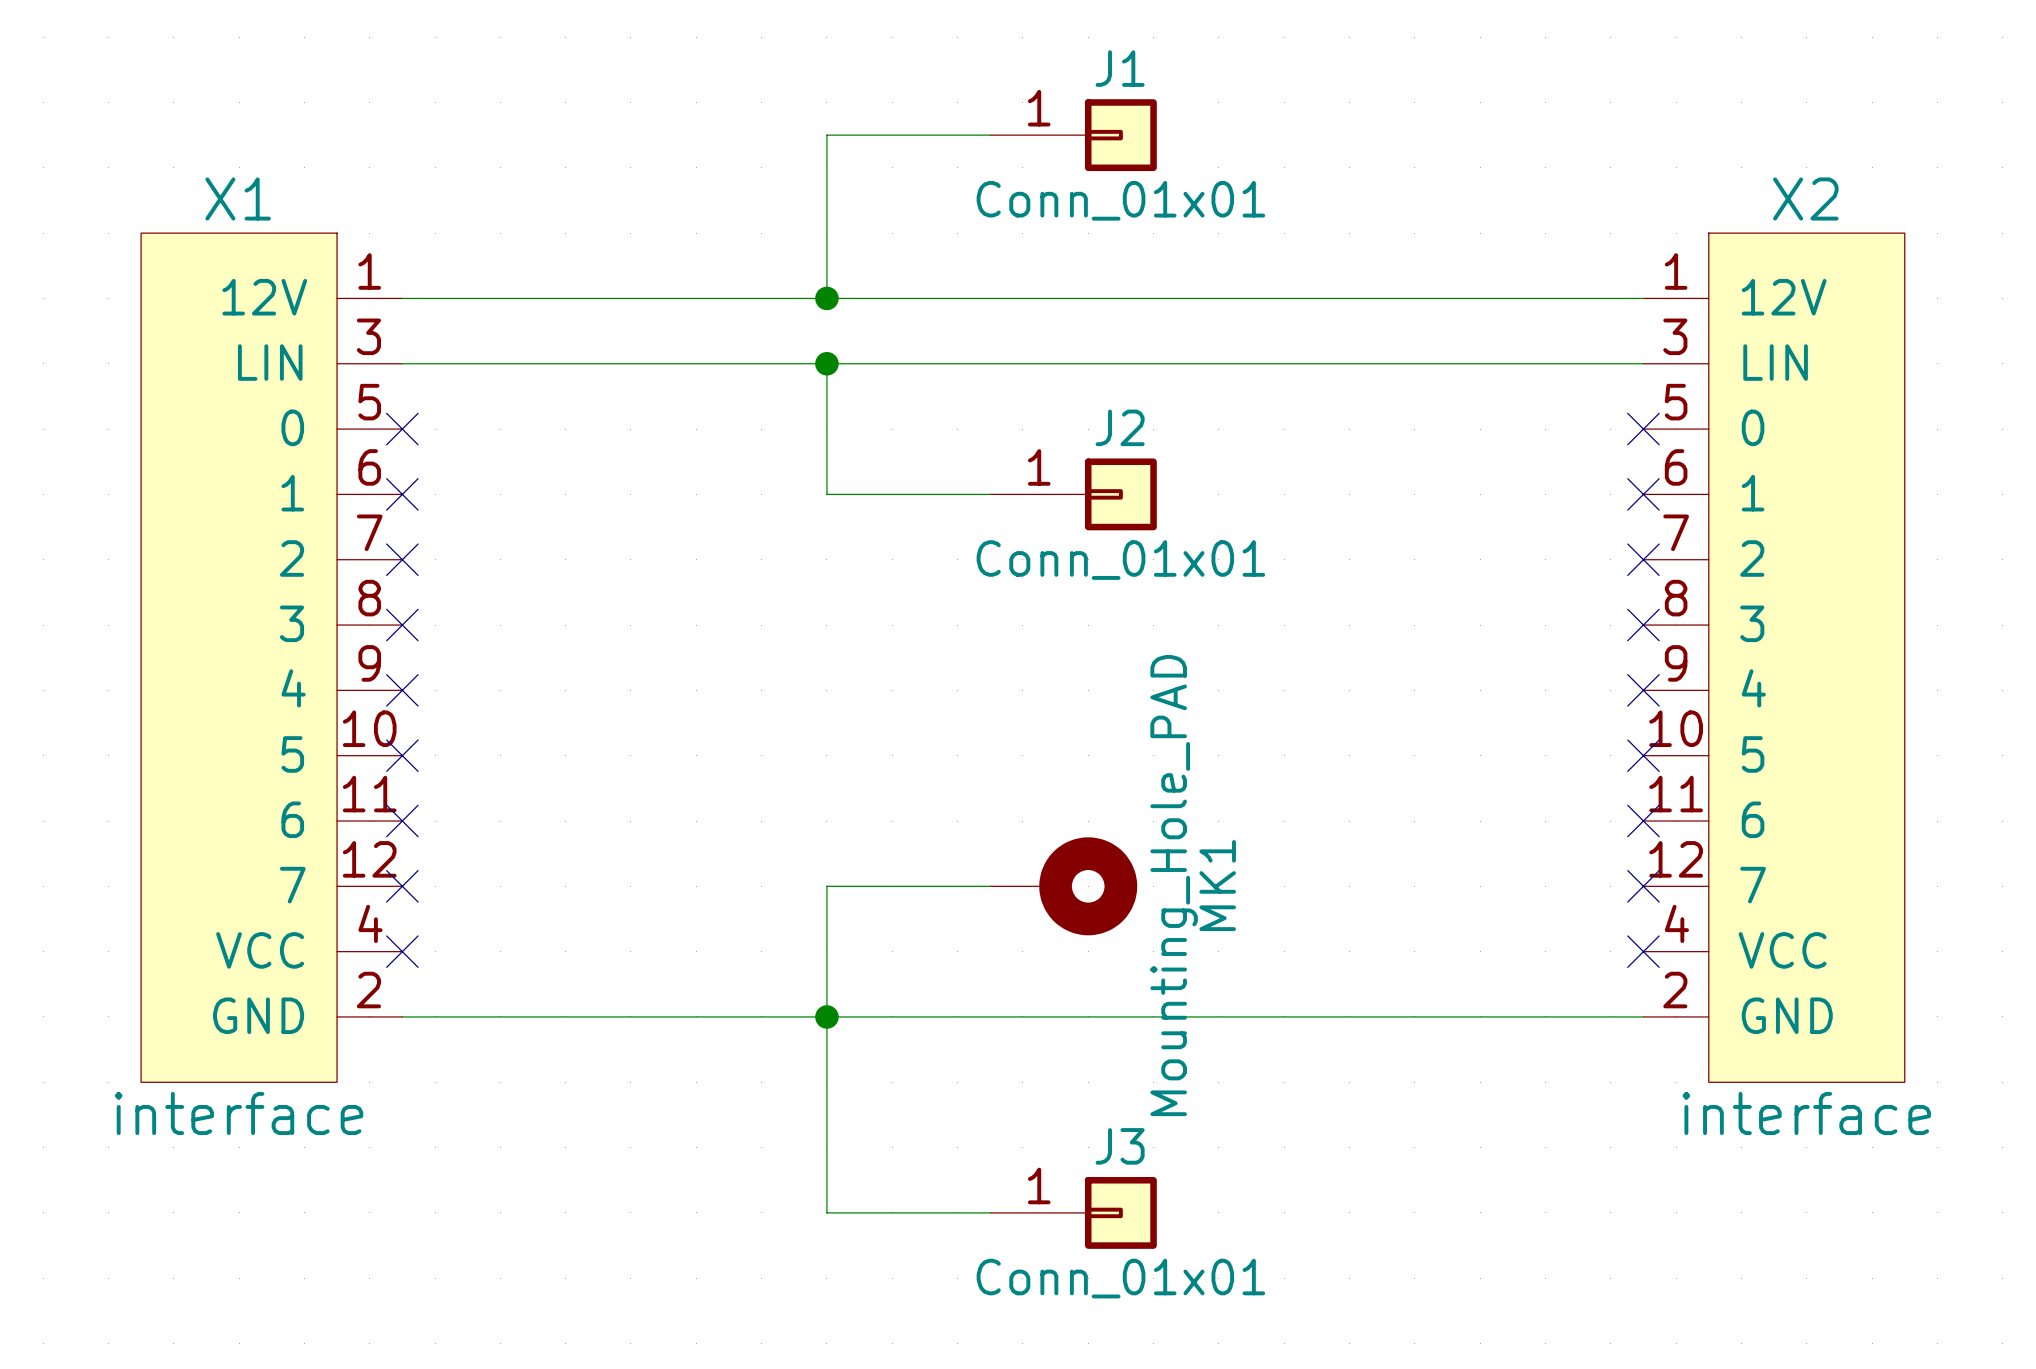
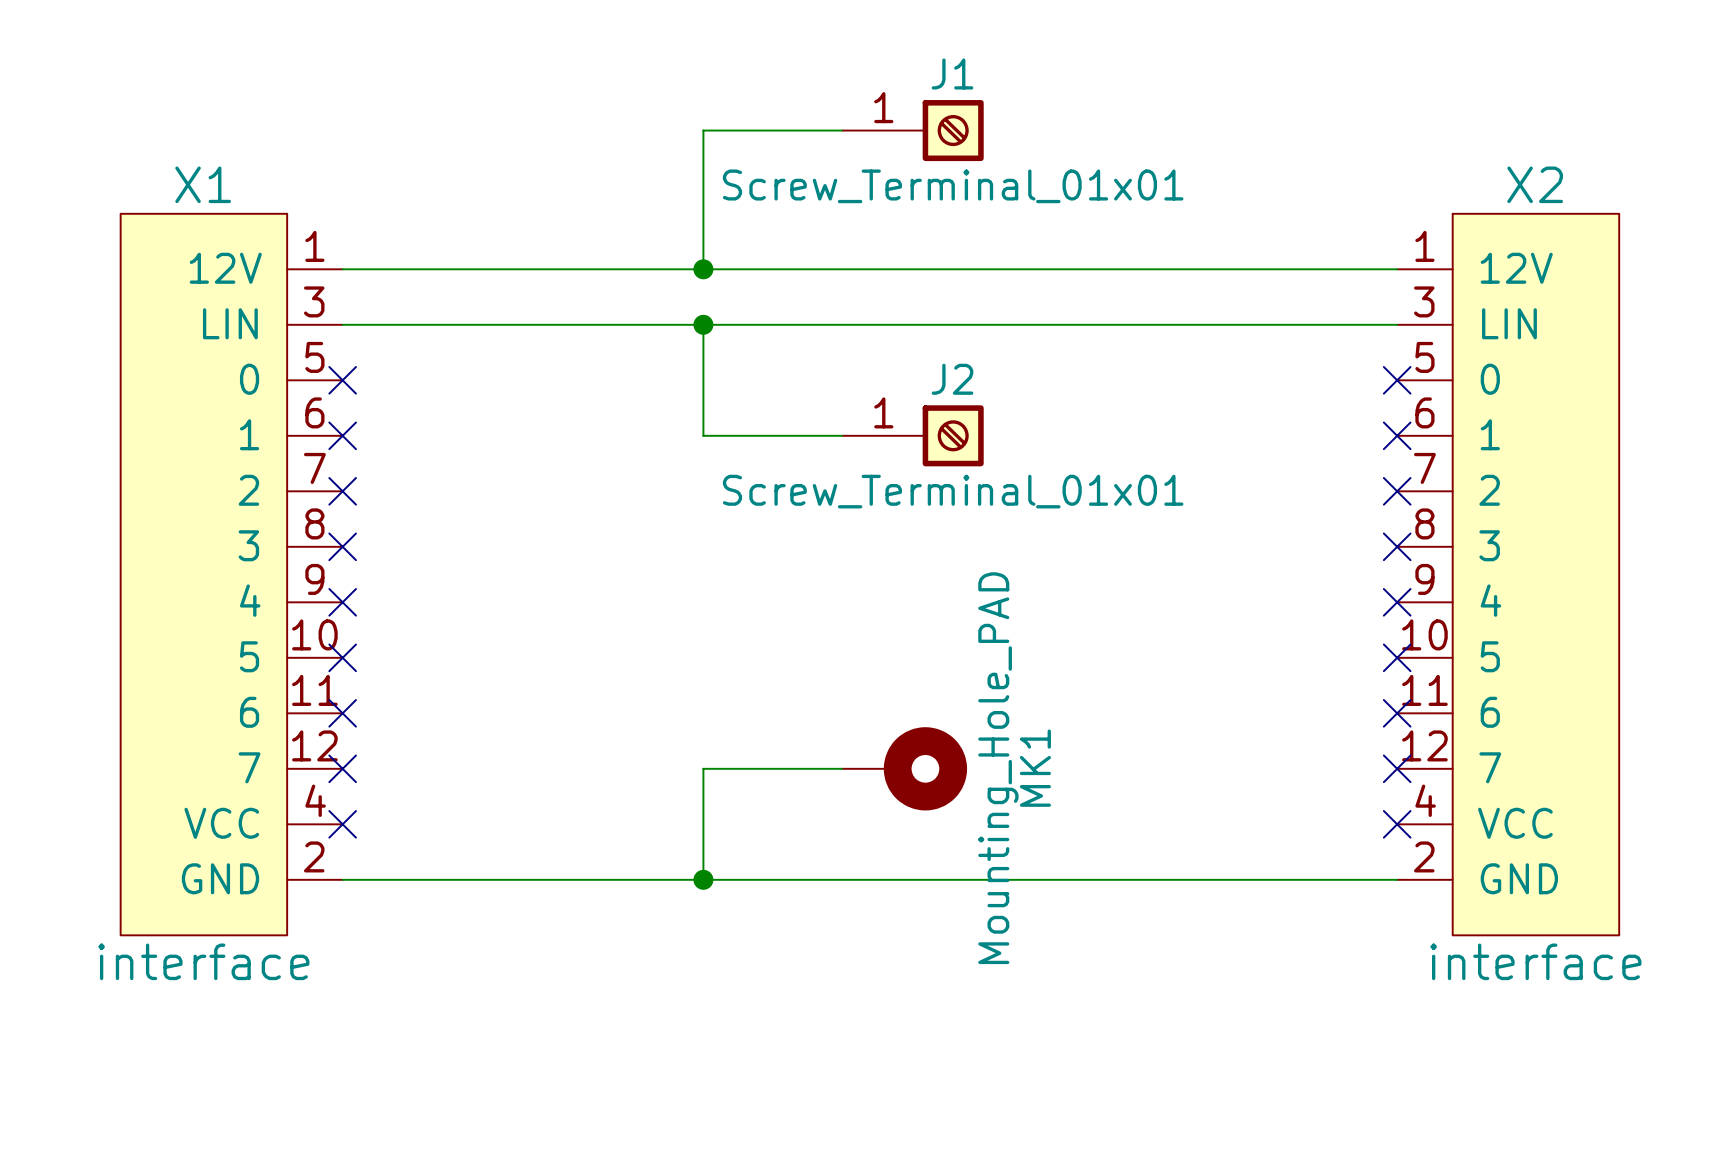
J1 symbol: [990, 99, 1157, 172] -> [842, 100, 984, 162]
J1 value: Conn_01x01 (1120, 200) -> Screw_Terminal_01x01 (953, 186)
J2 symbol: [990, 458, 1157, 531] -> [842, 405, 984, 467]
J2 value: Conn_01x01 (1120, 560) -> Screw_Terminal_01x01 (953, 491)
wire: (826, 1016) (826, 1212) (990, 1212) -> none
J3: Conn_01x01 (1073, 1212) -> none

